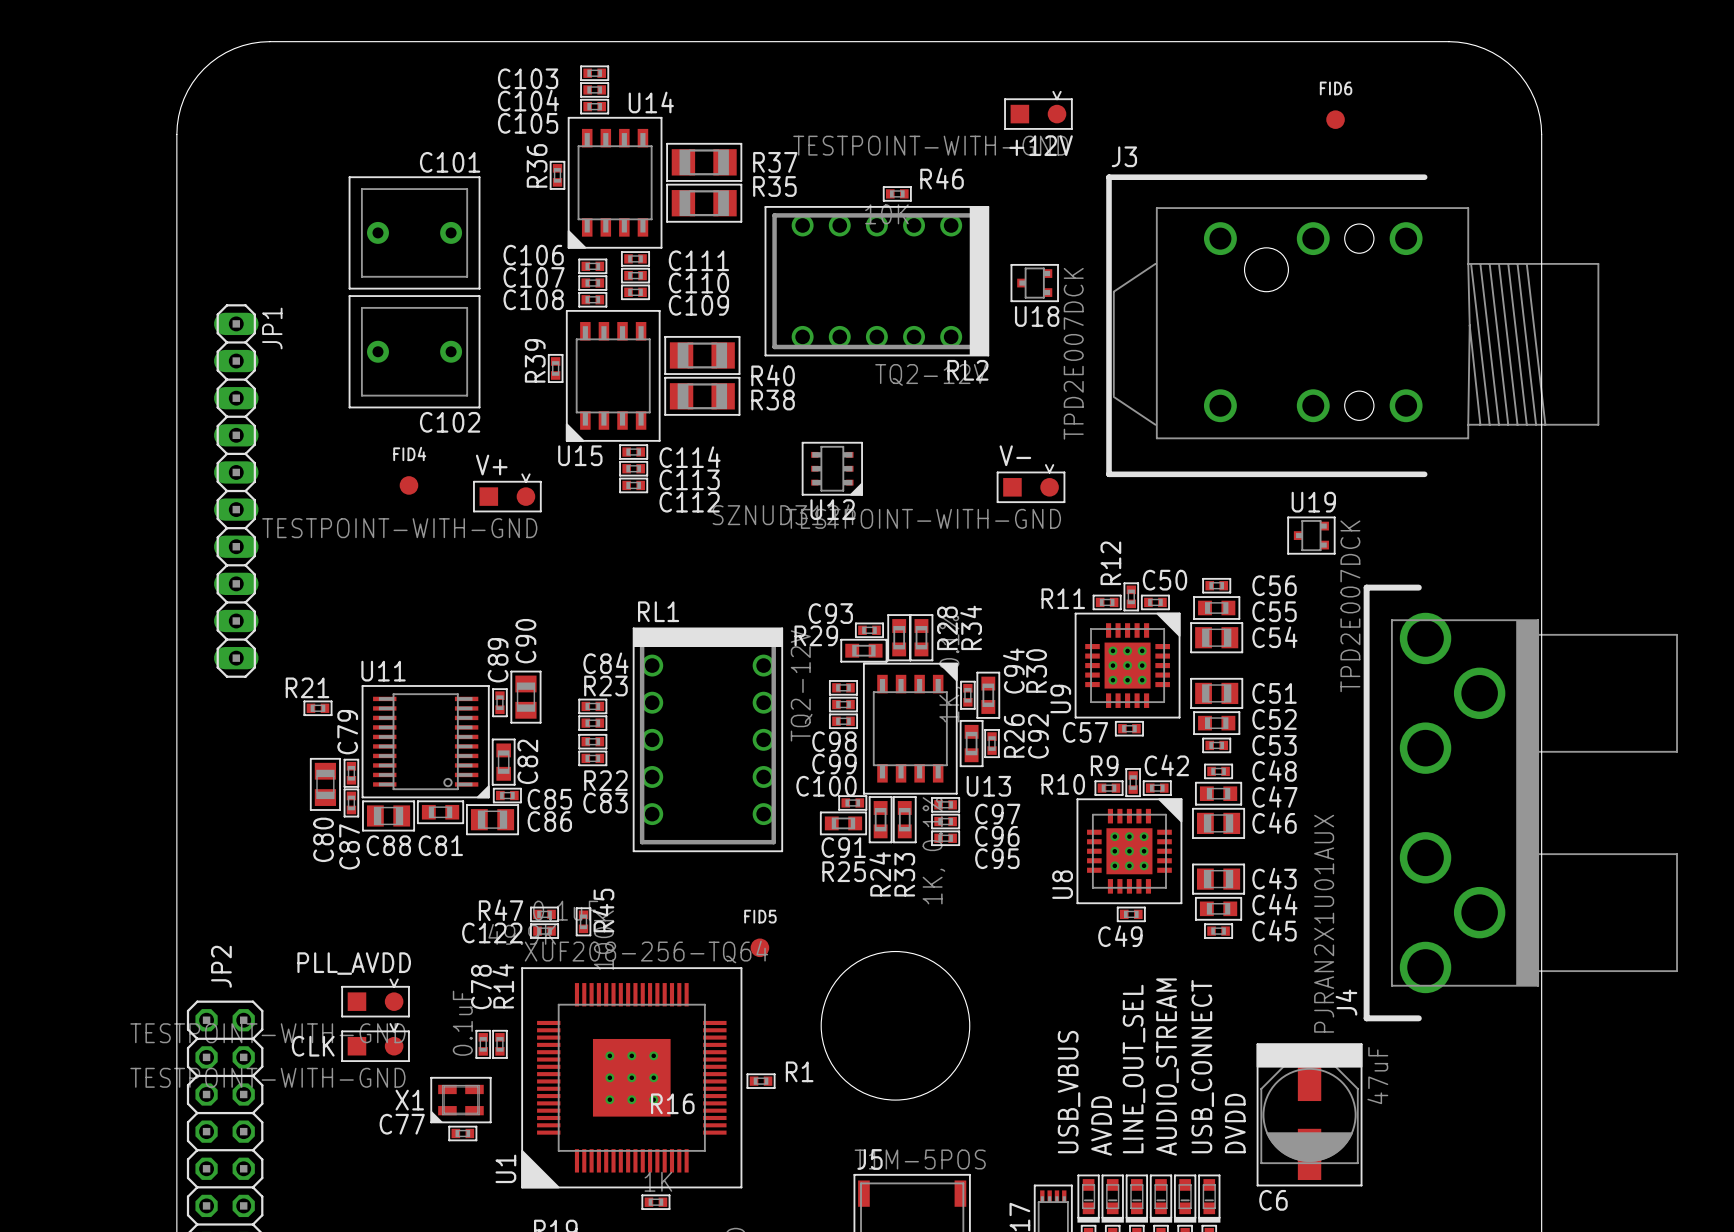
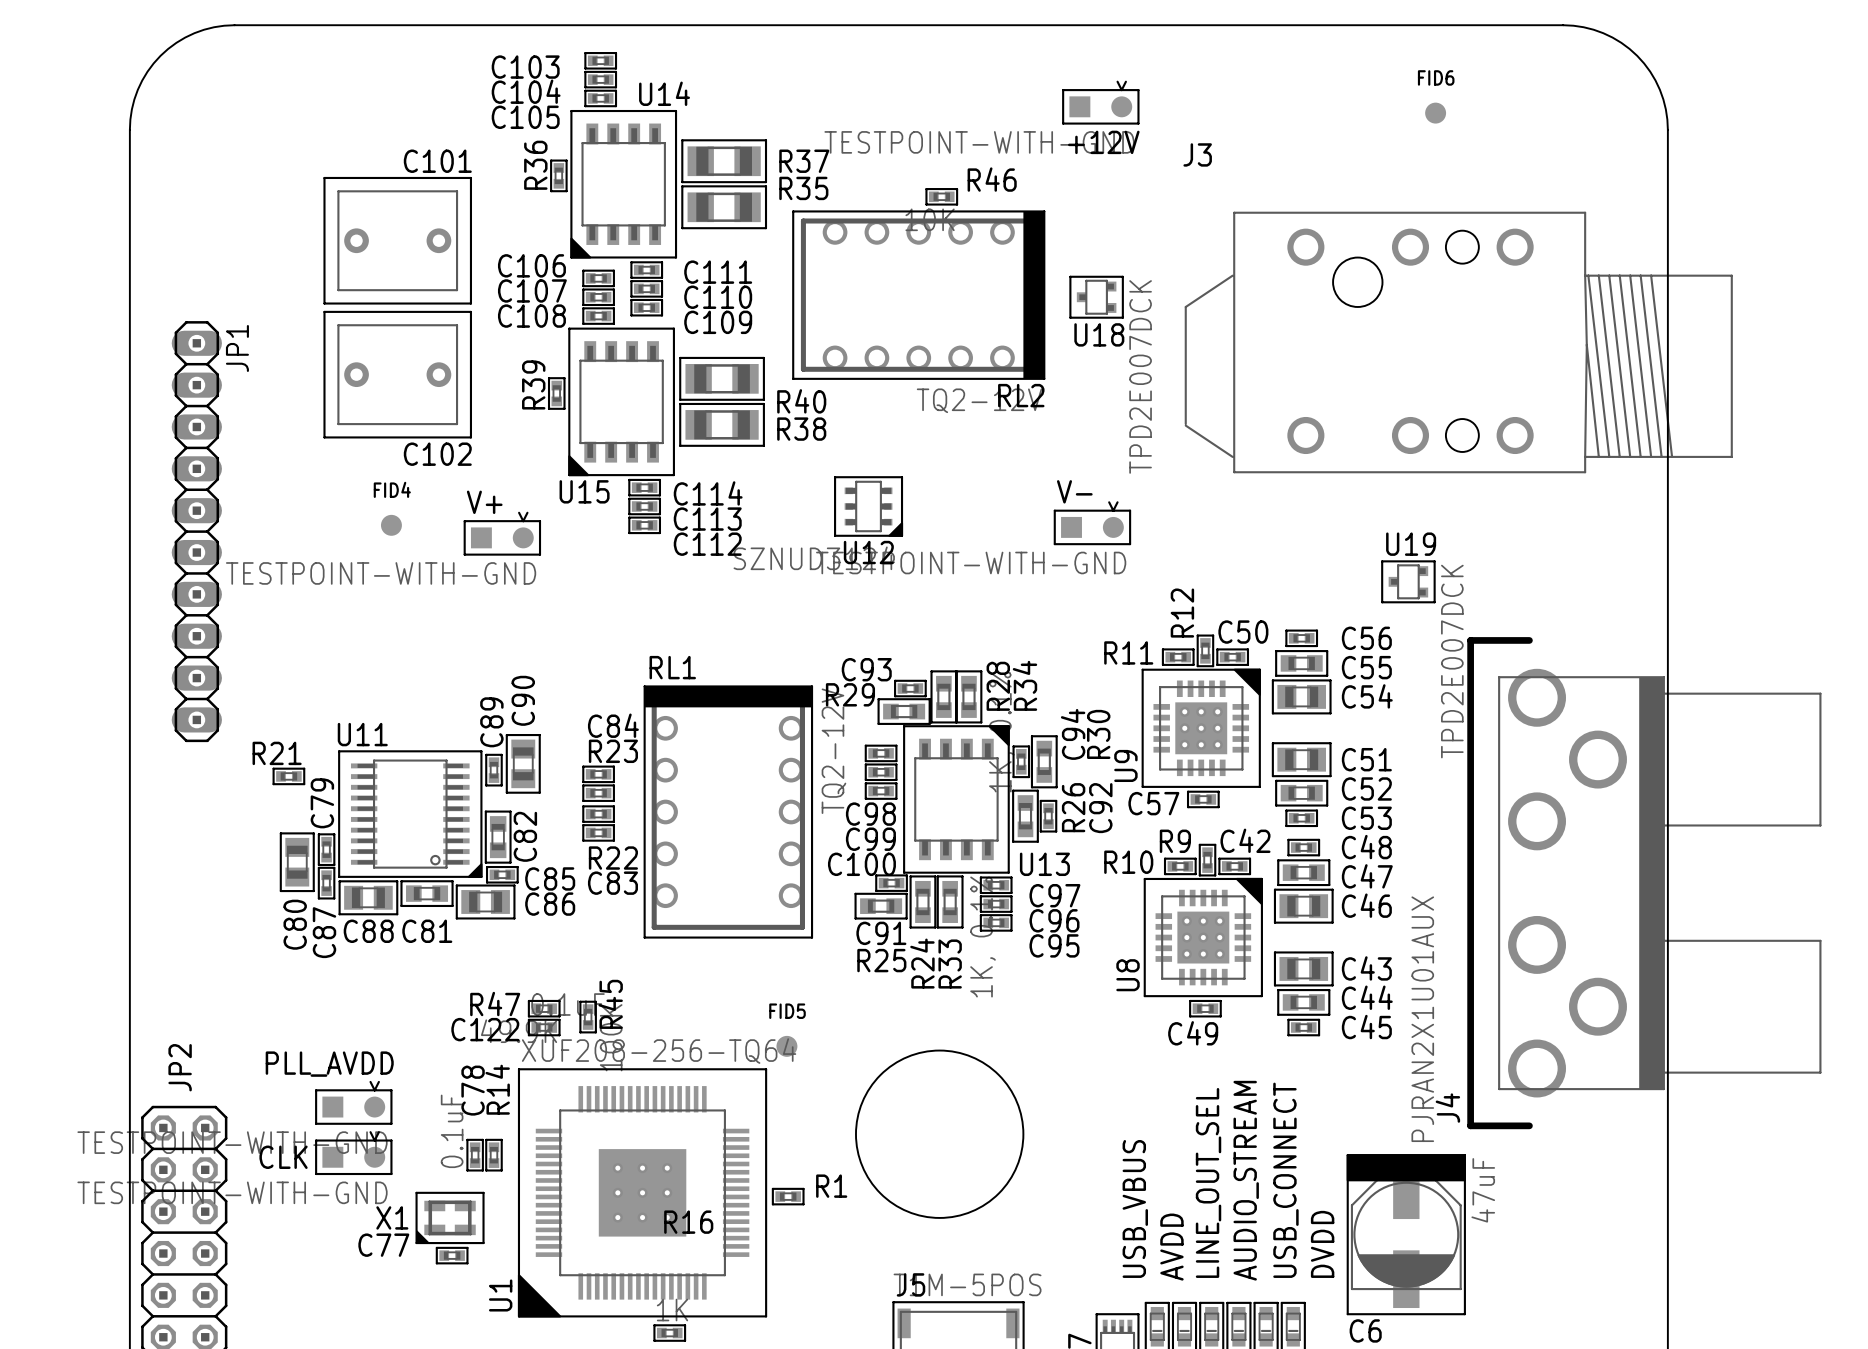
J3 footprint: [1106, 174, 1600, 478] -> [1184, 211, 1733, 474]

